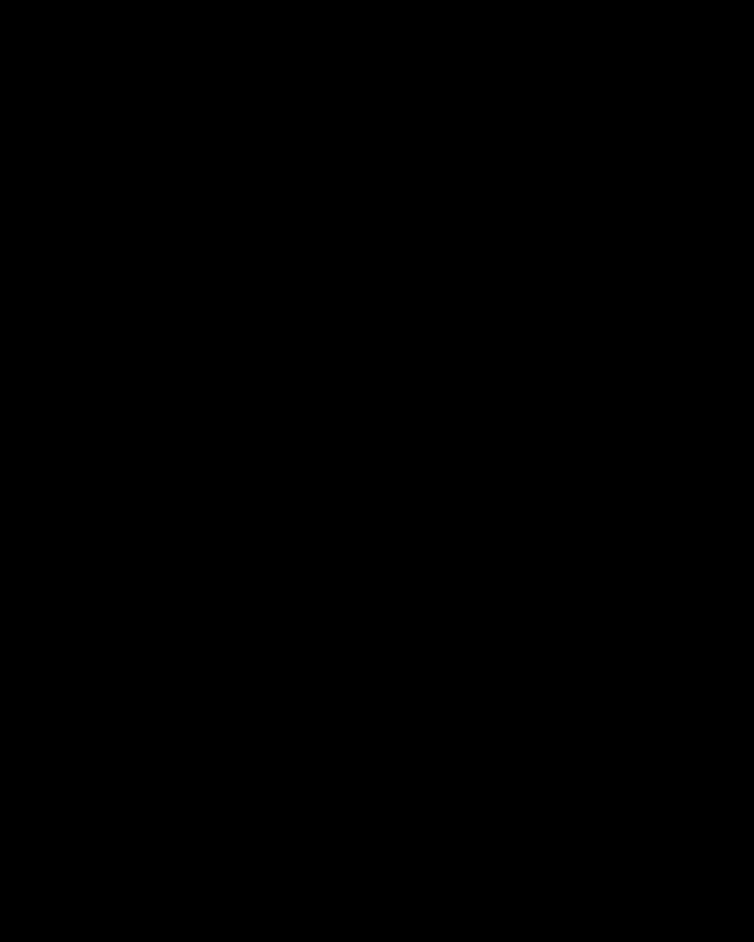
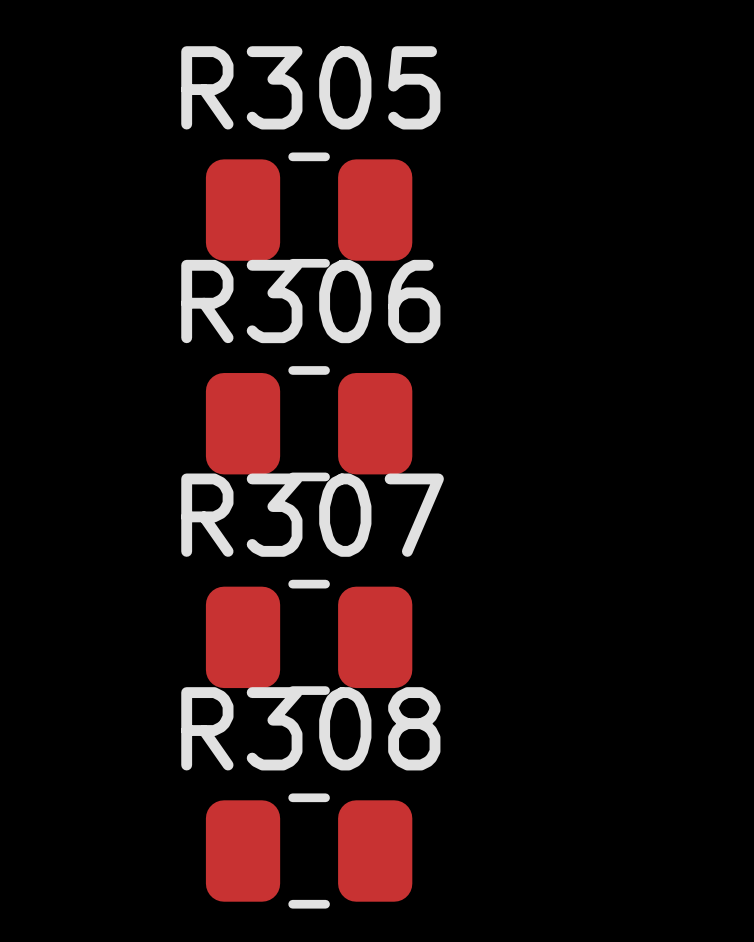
R305: none -> (309, 210)
R306: none -> (309, 423)
R307: none -> (309, 637)
R308: none -> (309, 851)

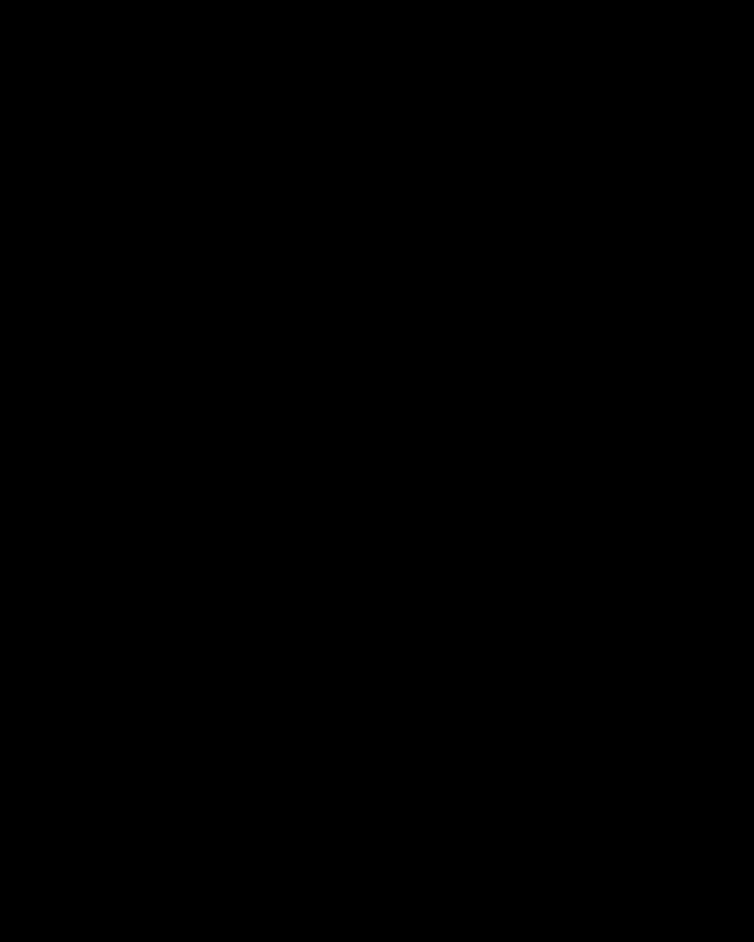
R305: (309, 210) -> none
R306: (309, 423) -> none
R307: (309, 637) -> none
R308: (309, 851) -> none

